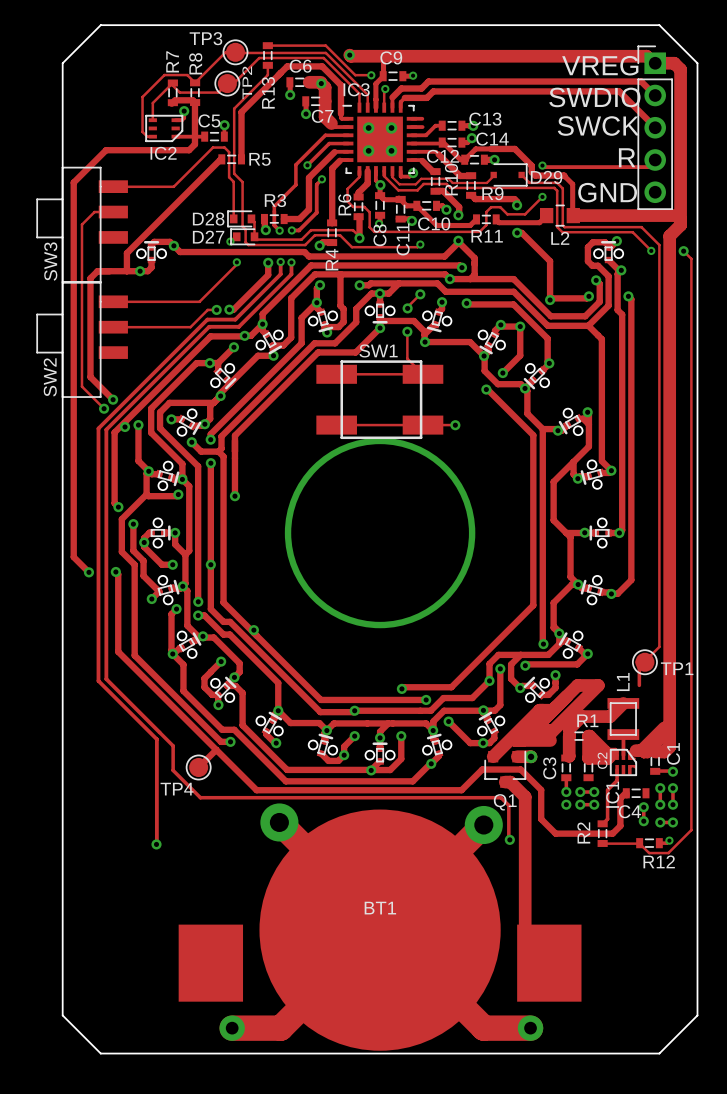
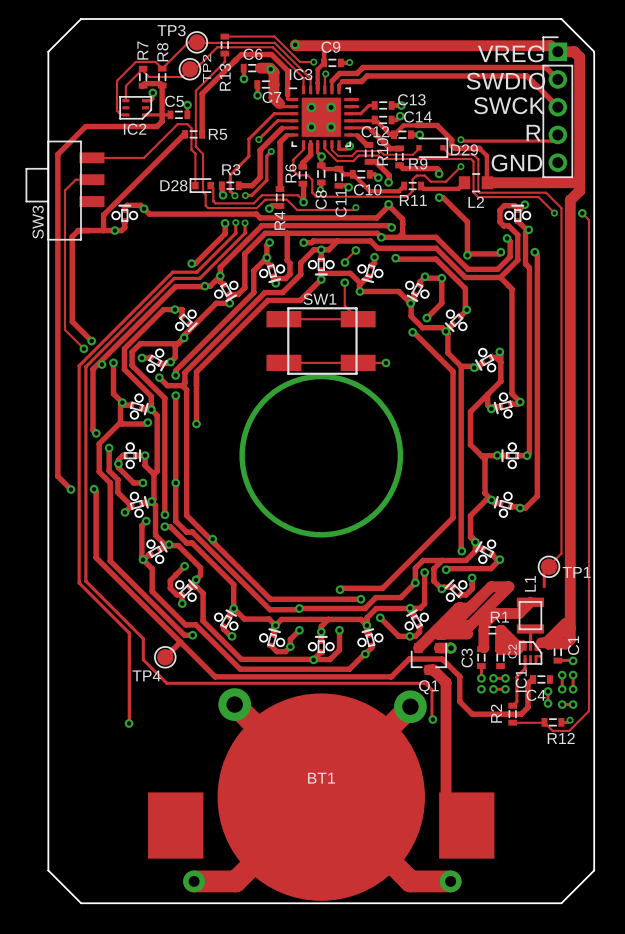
D27: (244, 236) -> none
via: (230, 241) -> none
track: (236, 262) (199, 301) (113, 301) -> none
via: (236, 262) -> none
track: (216, 309) (207, 309) (190, 327) (113, 327) -> none
via: (216, 309) -> none
SW2: (82, 339) -> none
track: (233, 347) (218, 363) -> none
via: (233, 347) -> none

